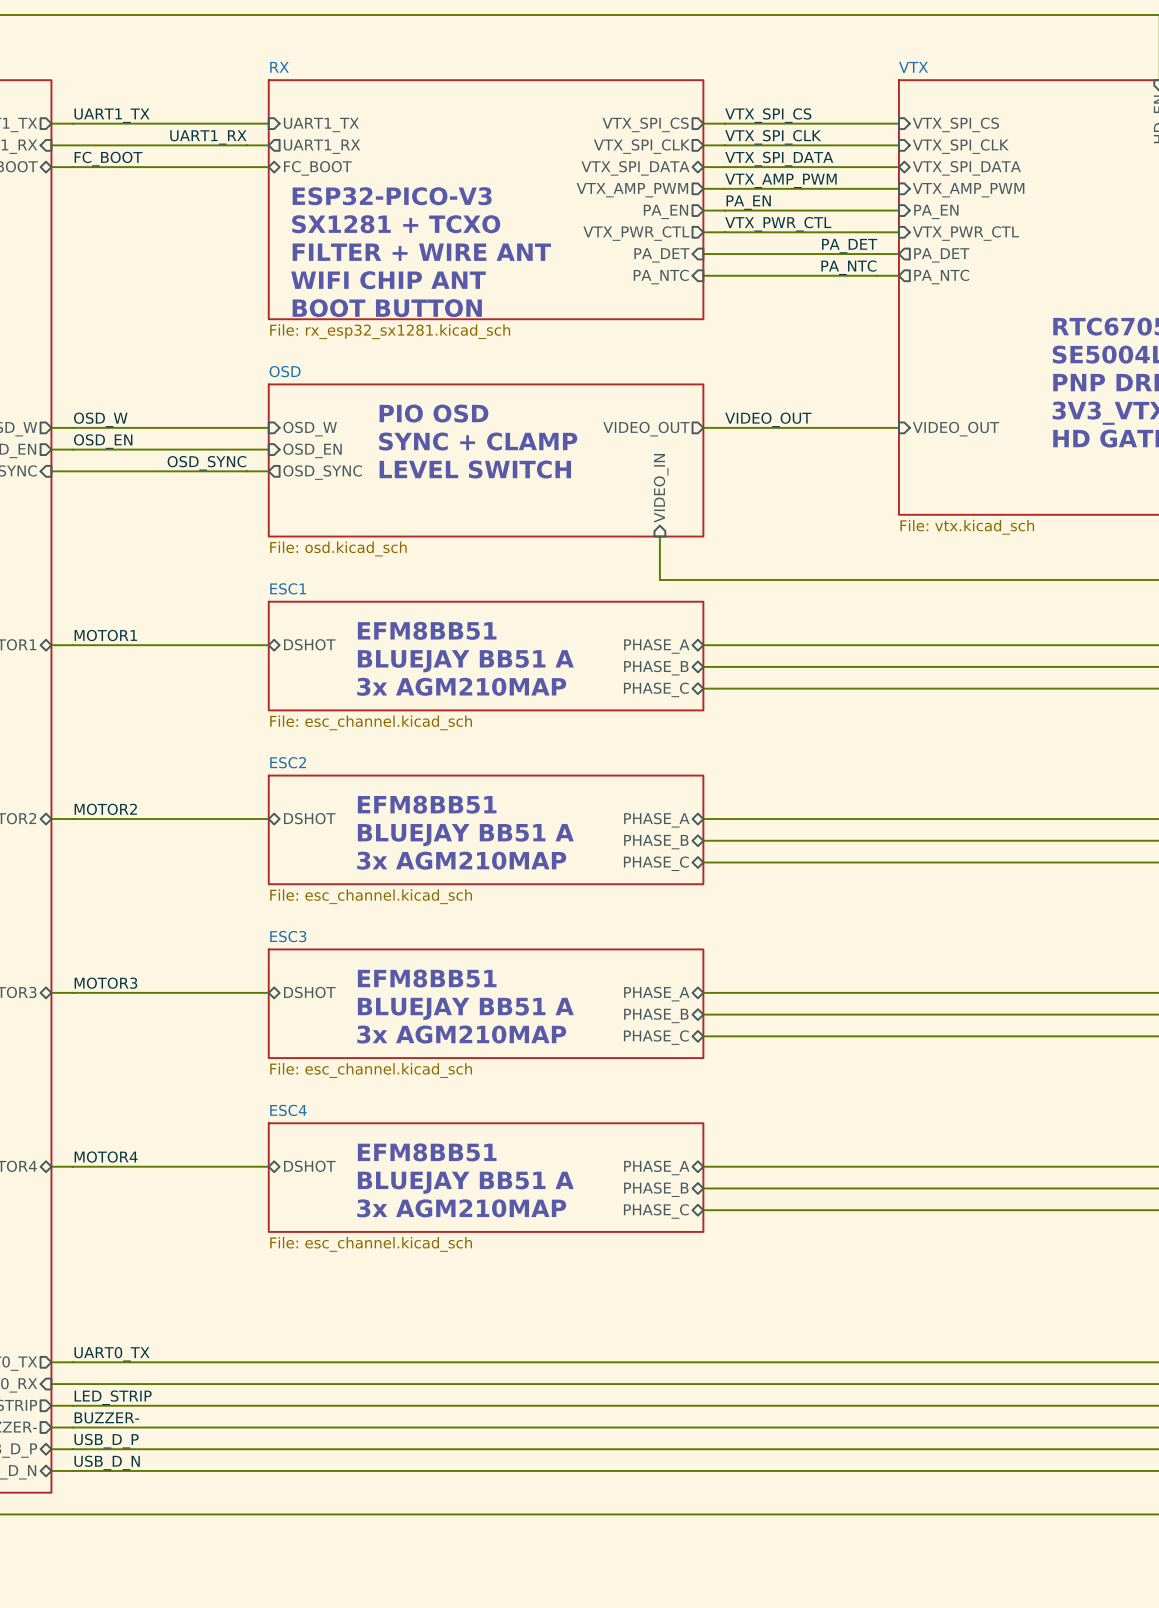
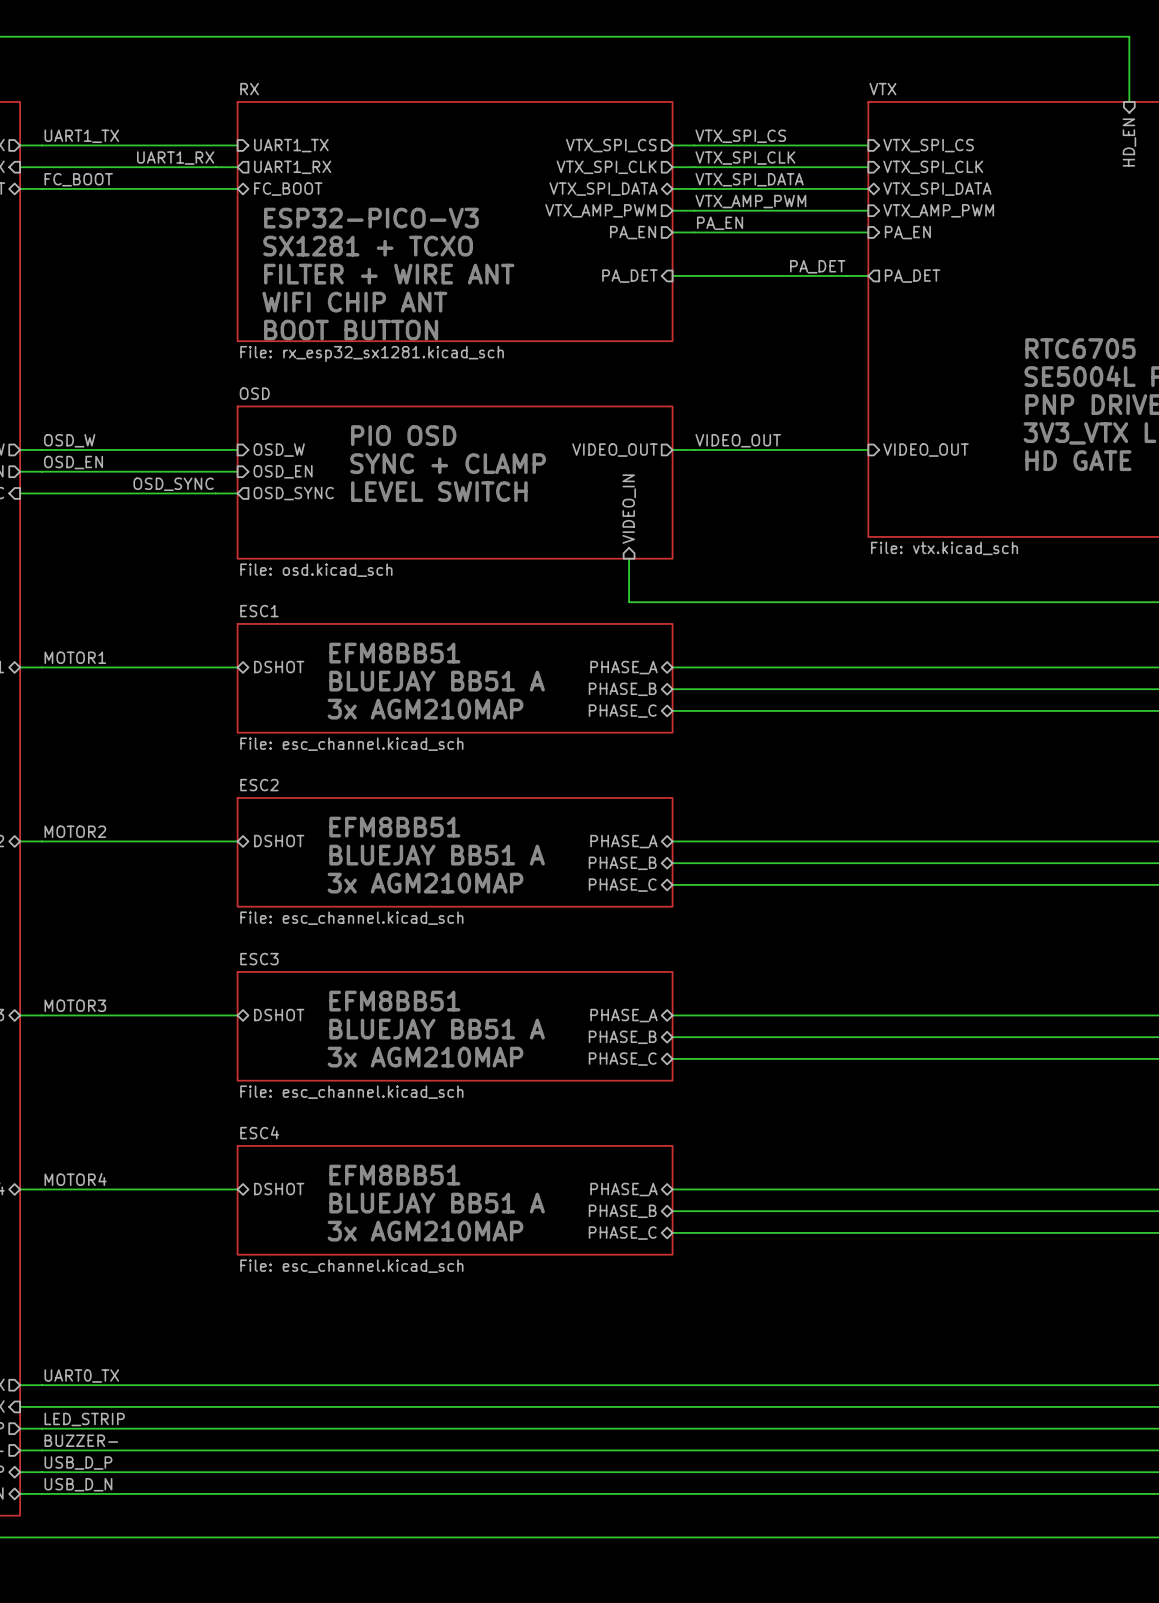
label: VTX_PWR_CTL (778, 224) -> none
wire: (703, 232) (898, 232) -> none
sheet pin: VTX_PWR_CTL (636, 233) -> none
sheet pin: VTX_PWR_CTL (965, 233) -> none
label: PA_NTC (848, 267) -> none
wire: (703, 275) (898, 275) -> none
sheet pin: PA_NTC (661, 277) -> none
sheet pin: PA_NTC (941, 277) -> none

